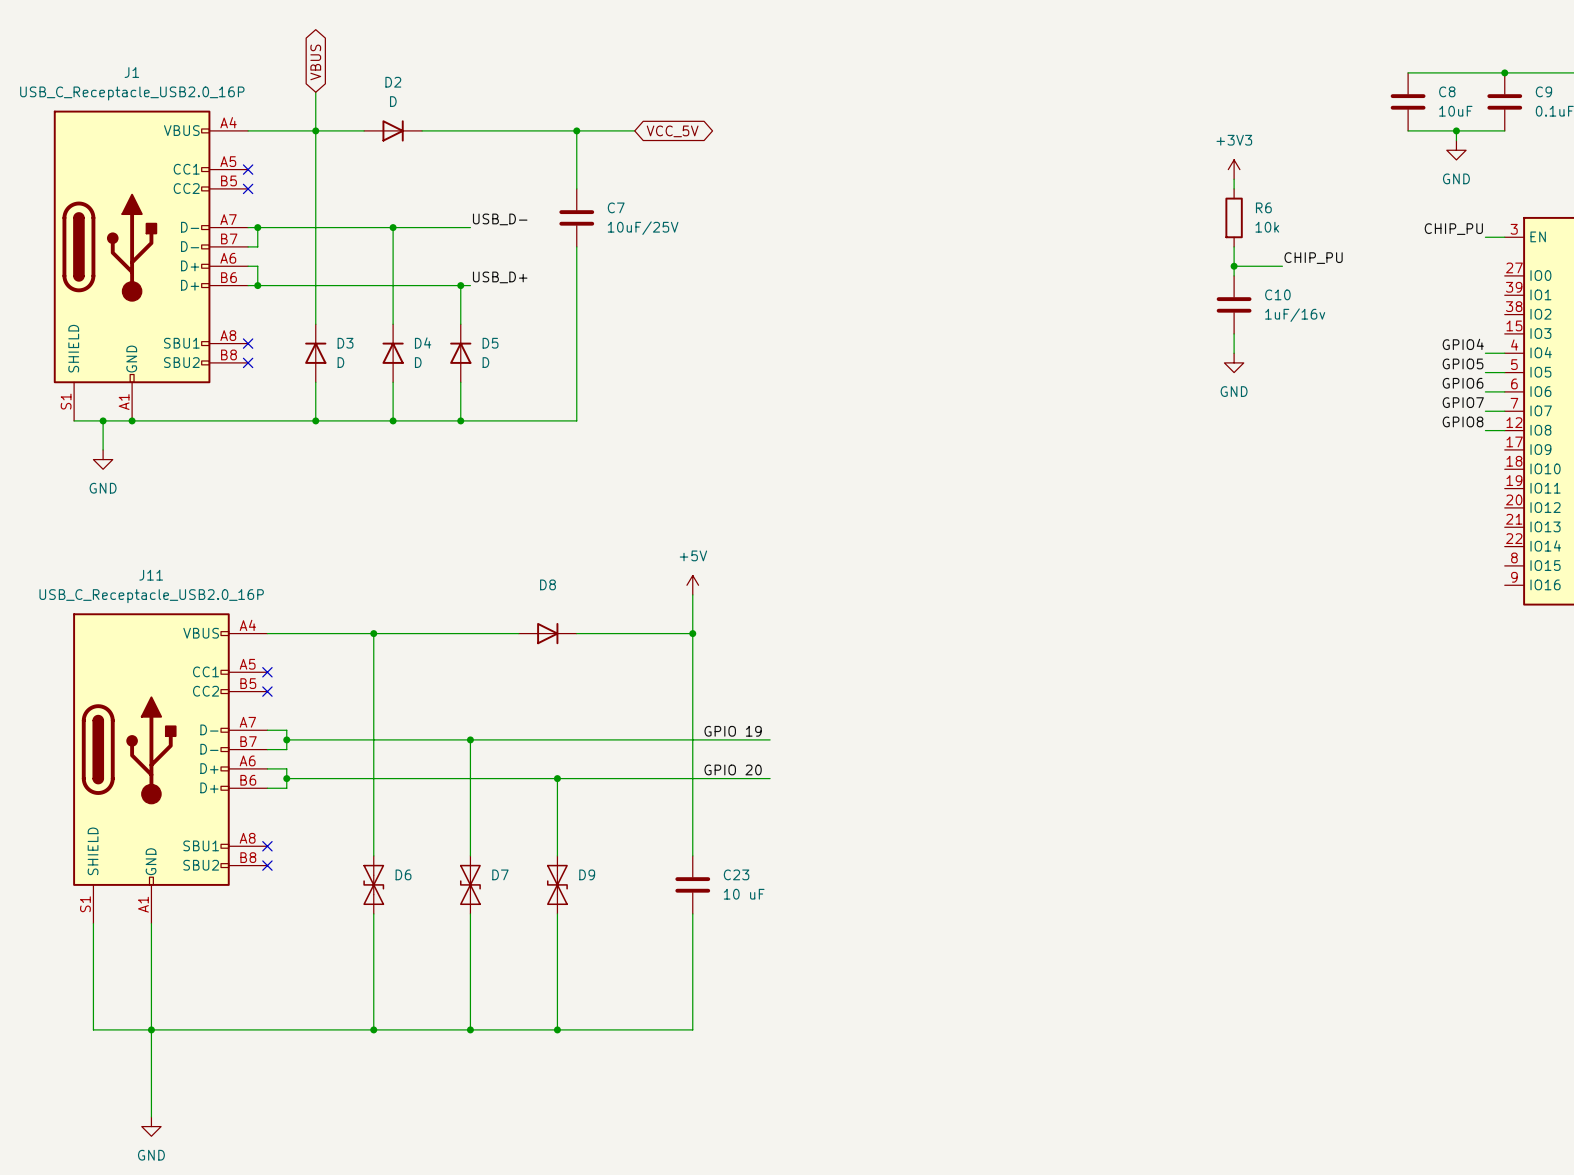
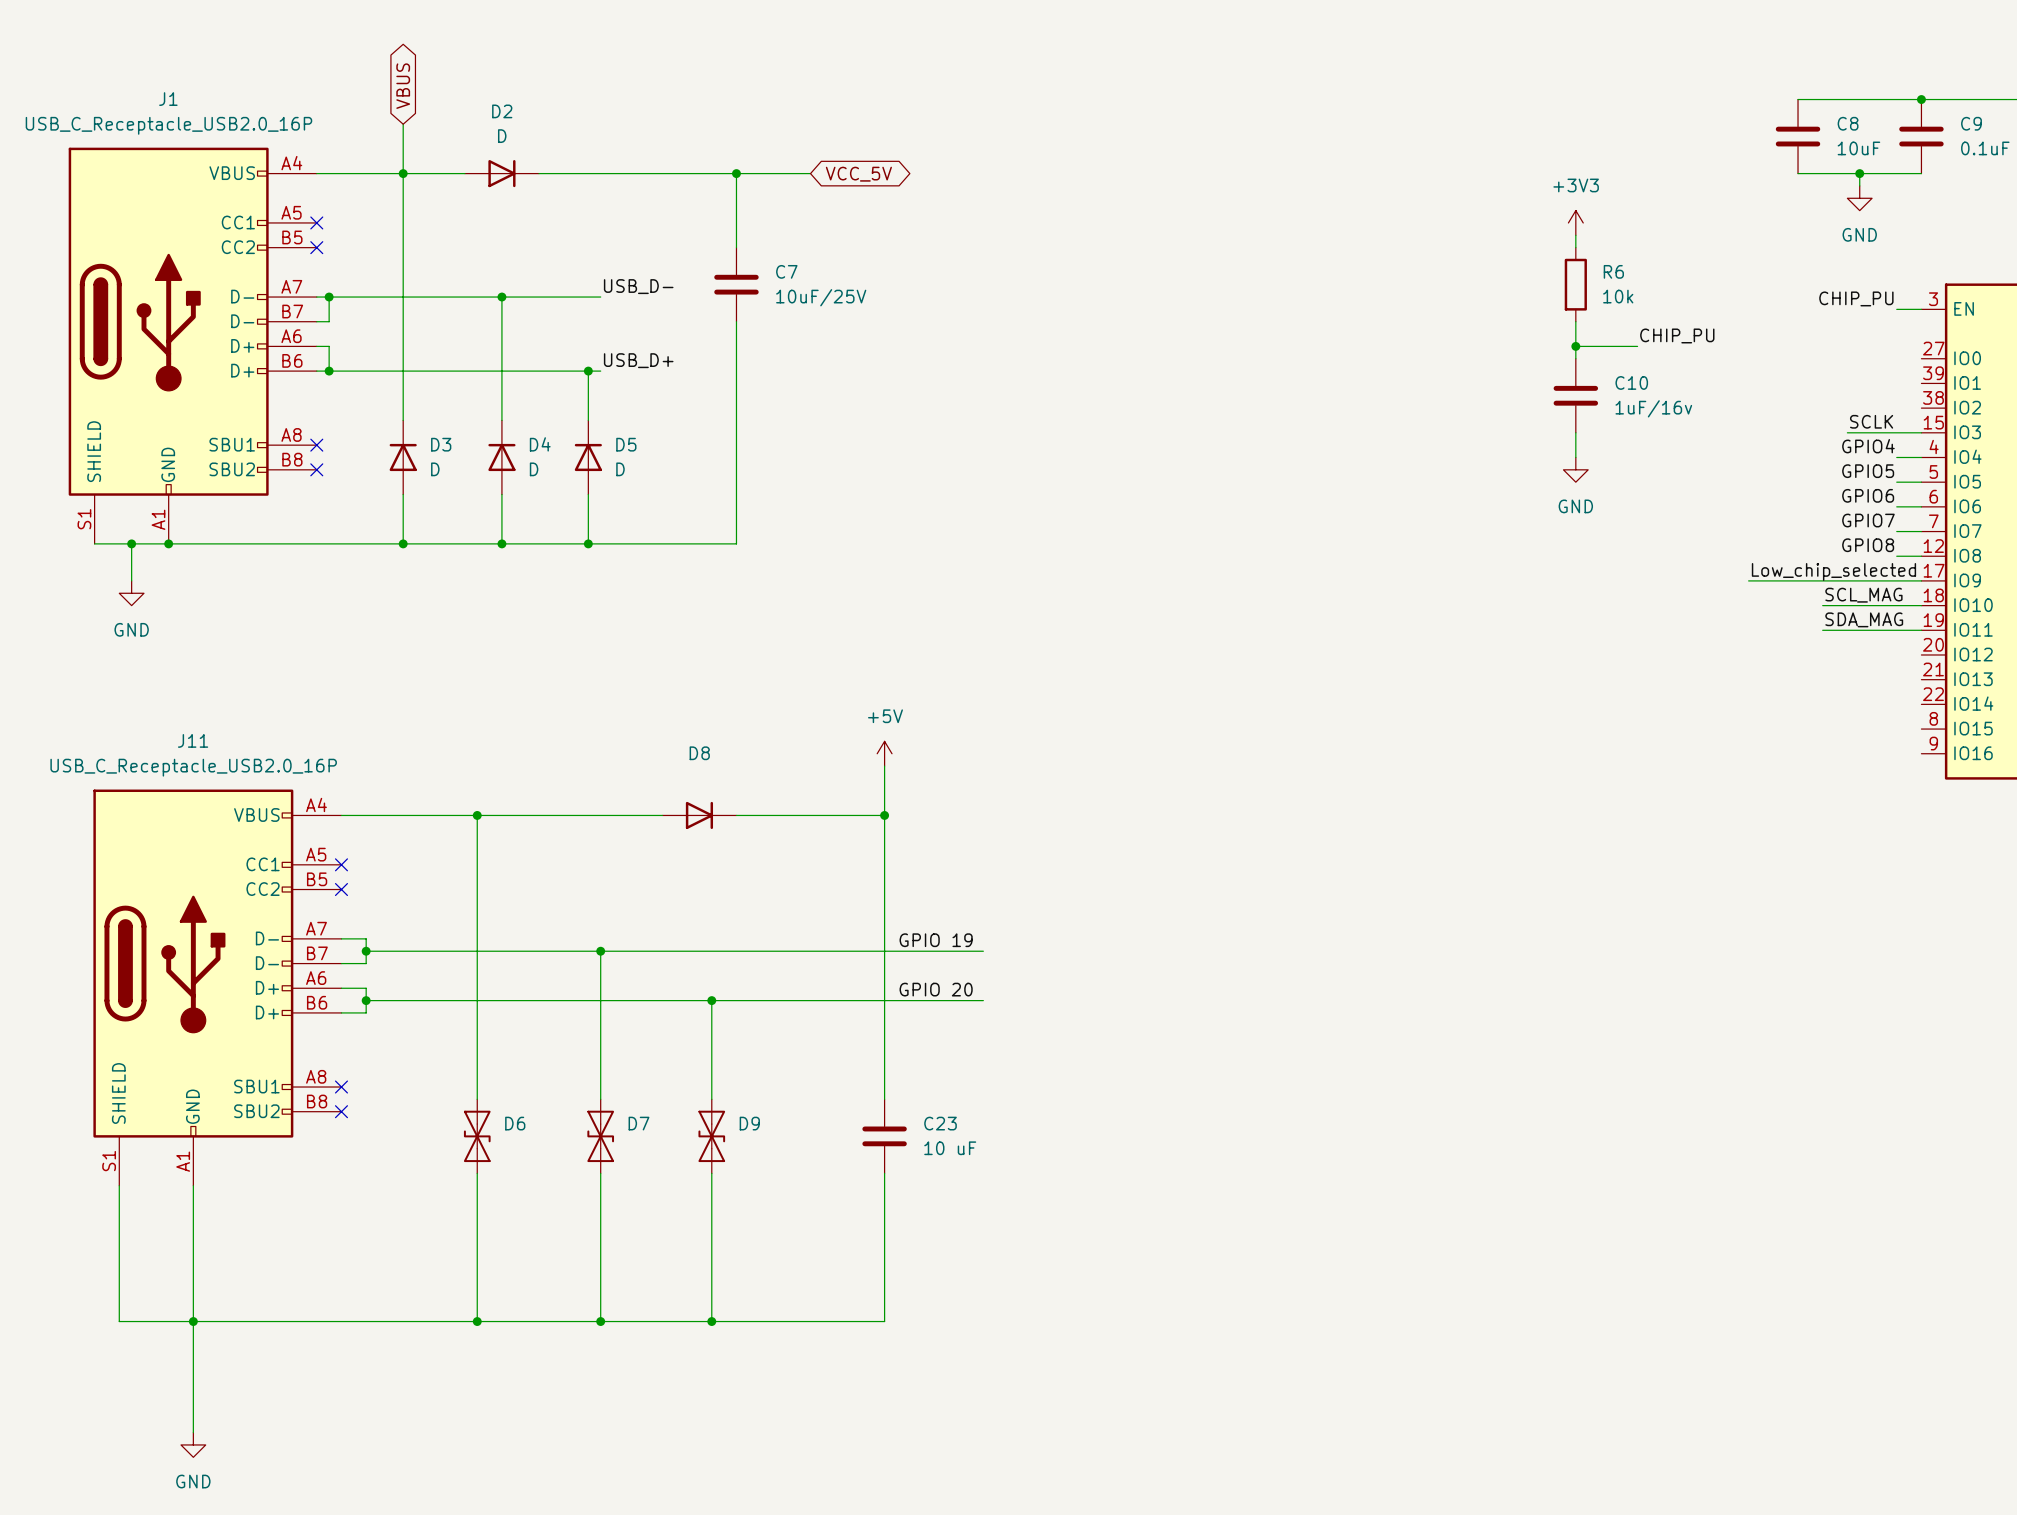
label: none -> SCLK (1871, 421)
wire: none -> (1847, 432) (1921, 432)
label: none -> Low_chip_selected (1833, 571)
wire: none -> (1748, 580) (1921, 580)
label: none -> SCL_MAG (1863, 595)
wire: none -> (1822, 605) (1921, 605)
label: none -> SDA_MAG (1864, 619)
wire: none -> (1822, 630) (1921, 630)

